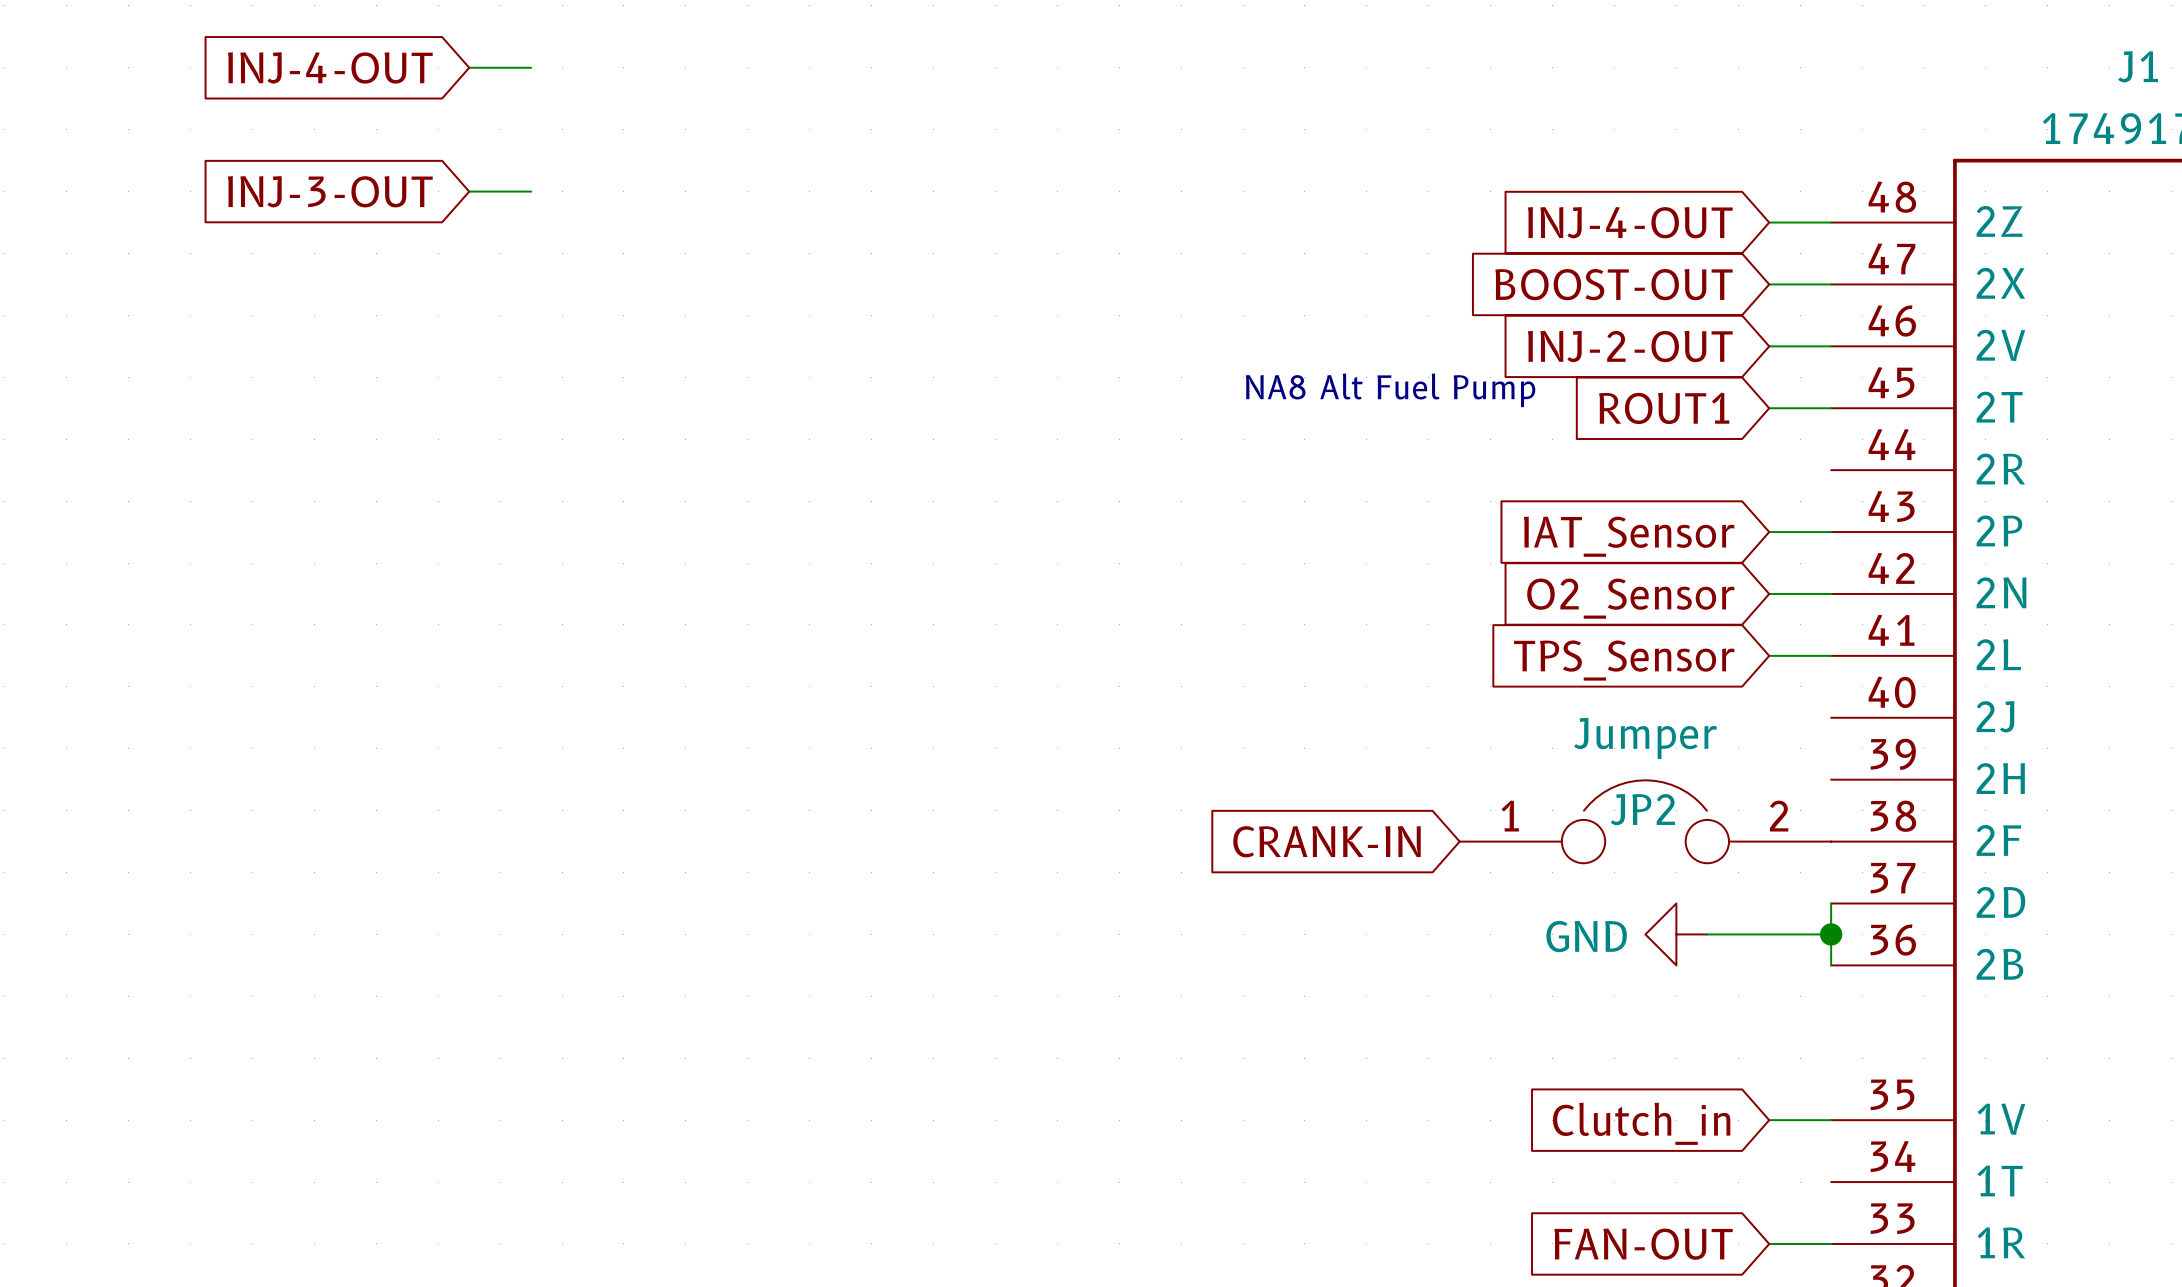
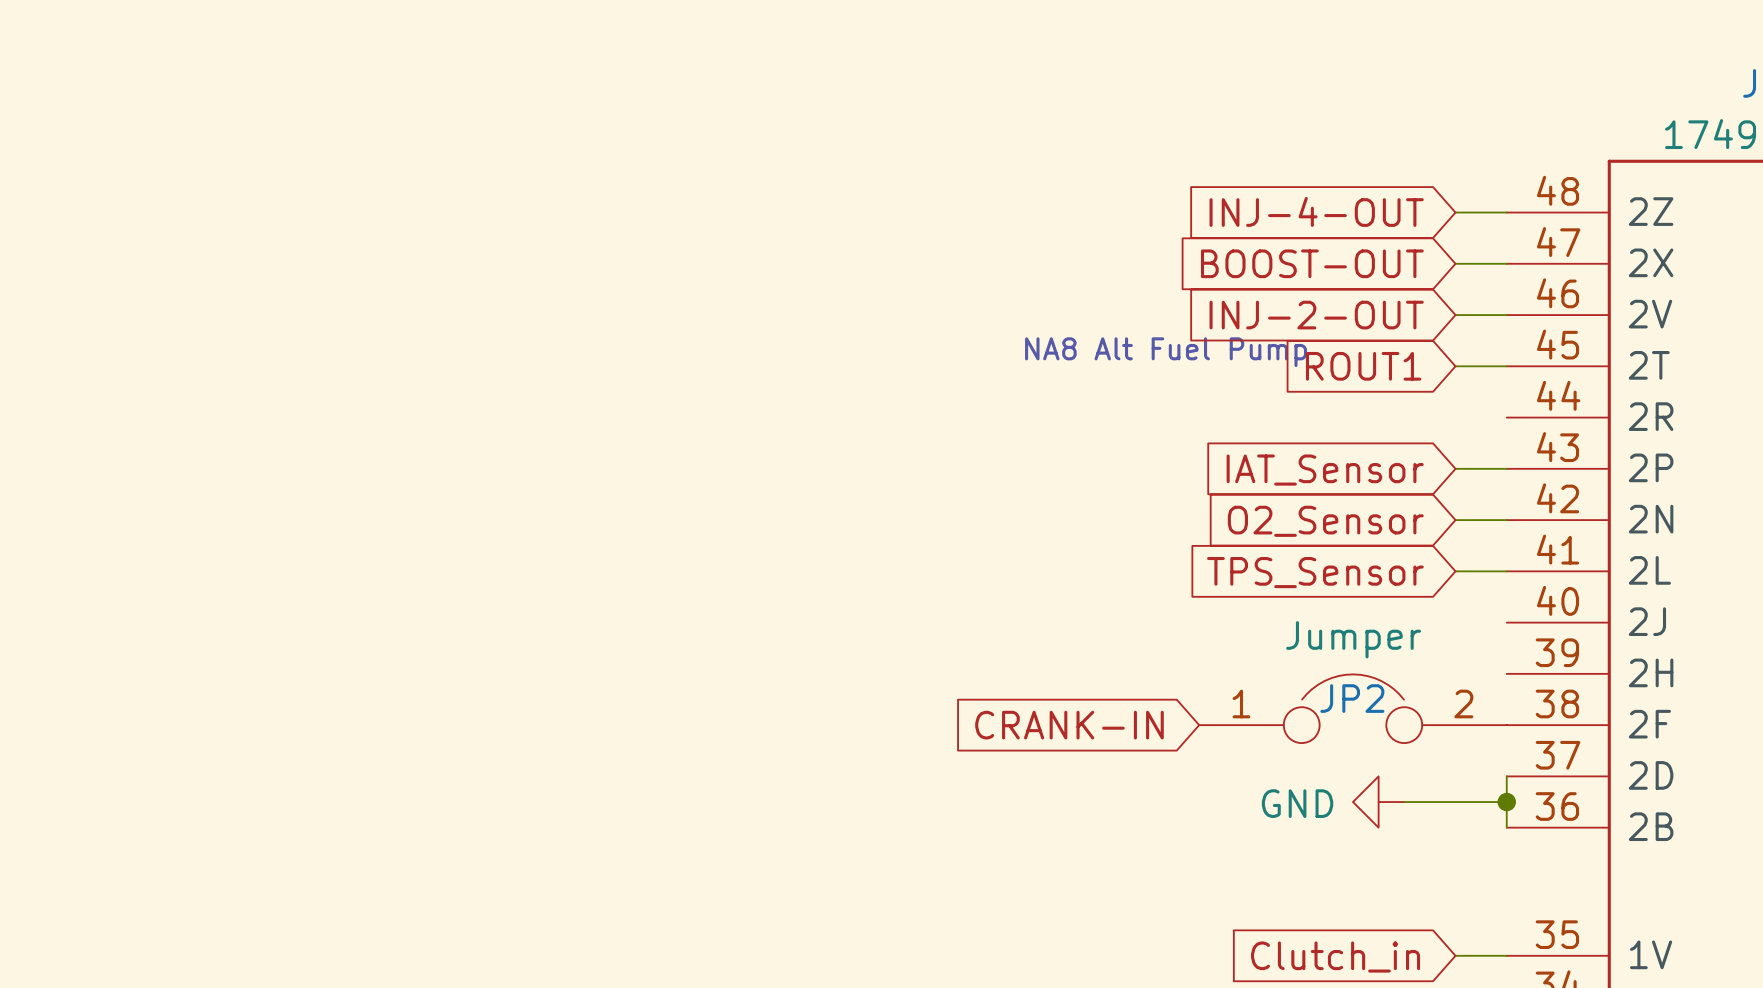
global label: INJ-4-OUT (330, 67) -> none
wire: (469, 67) (531, 67) -> none
global label: INJ-3-OUT (330, 191) -> none
wire: (469, 191) (531, 191) -> none

